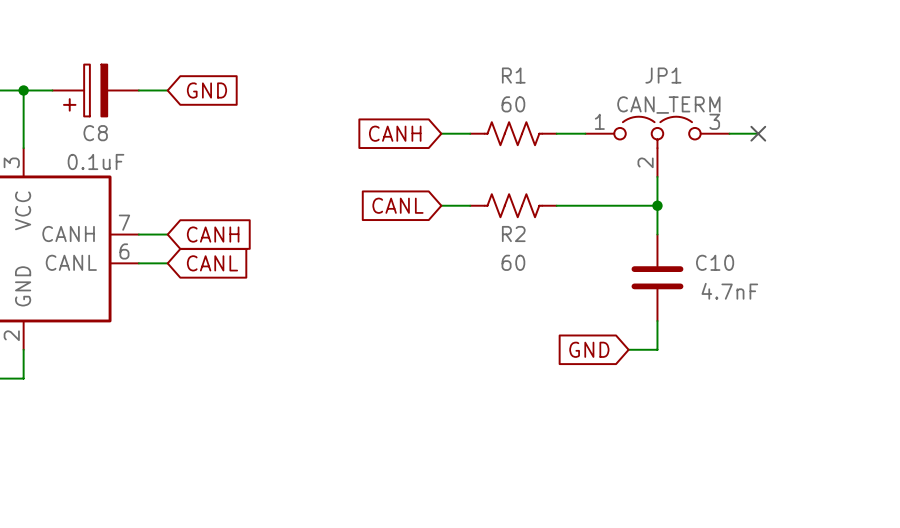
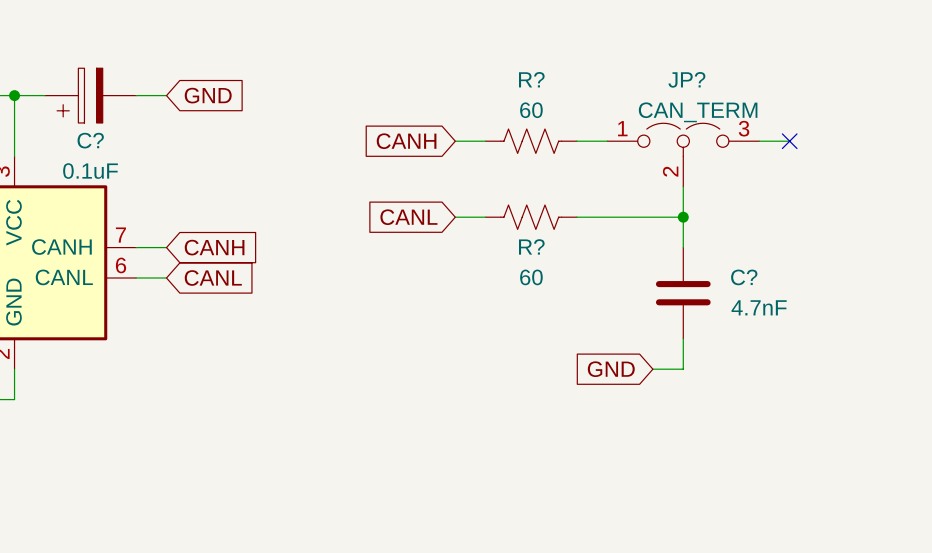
R1 name: R1 (513, 75) -> R? (531, 79)
JP1 name: JP1 (663, 75) -> JP? (686, 79)
C8 name: C8 (95, 133) -> C? (90, 140)
R2 name: R2 (513, 234) -> R? (531, 246)
C10 name: C10 (715, 262) -> C? (744, 277)

